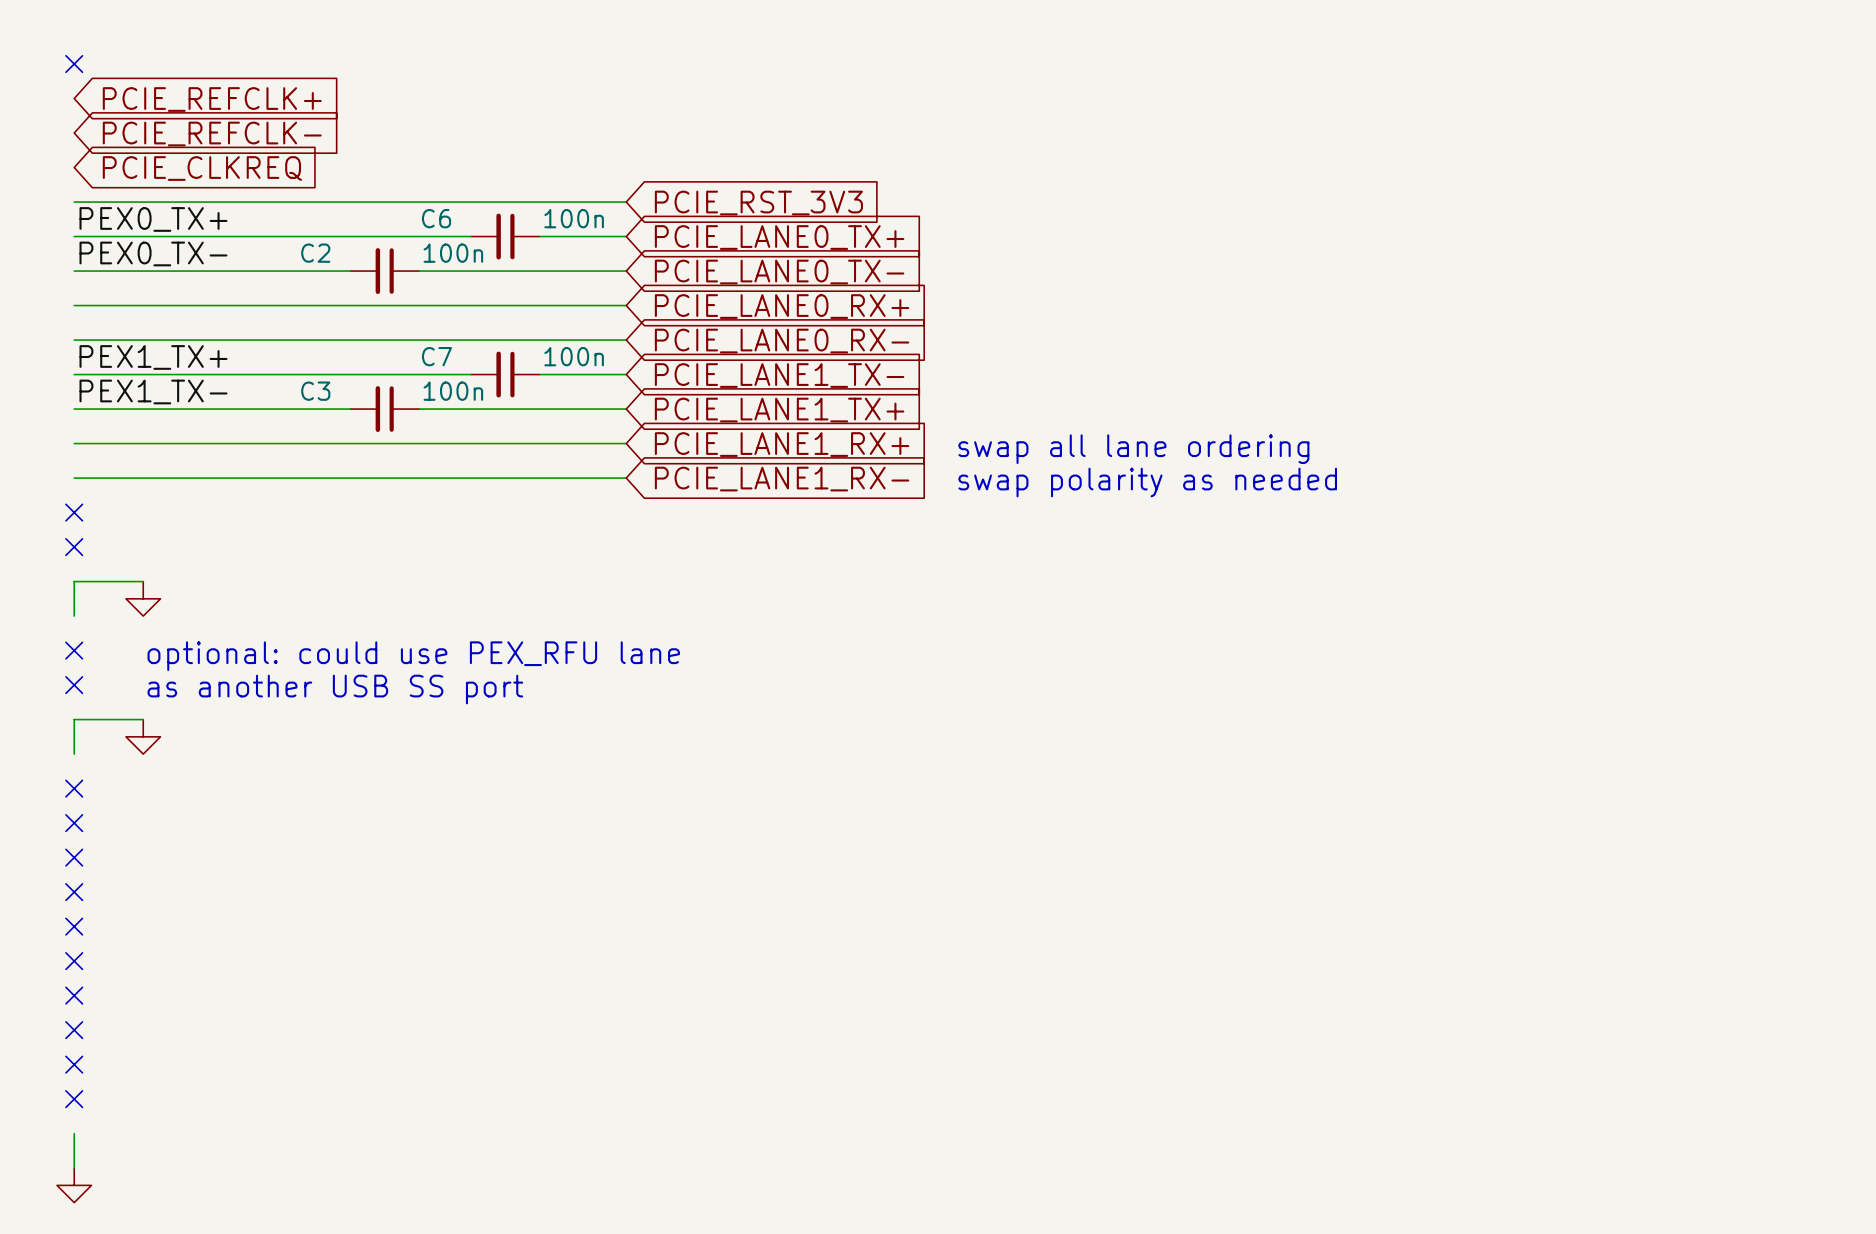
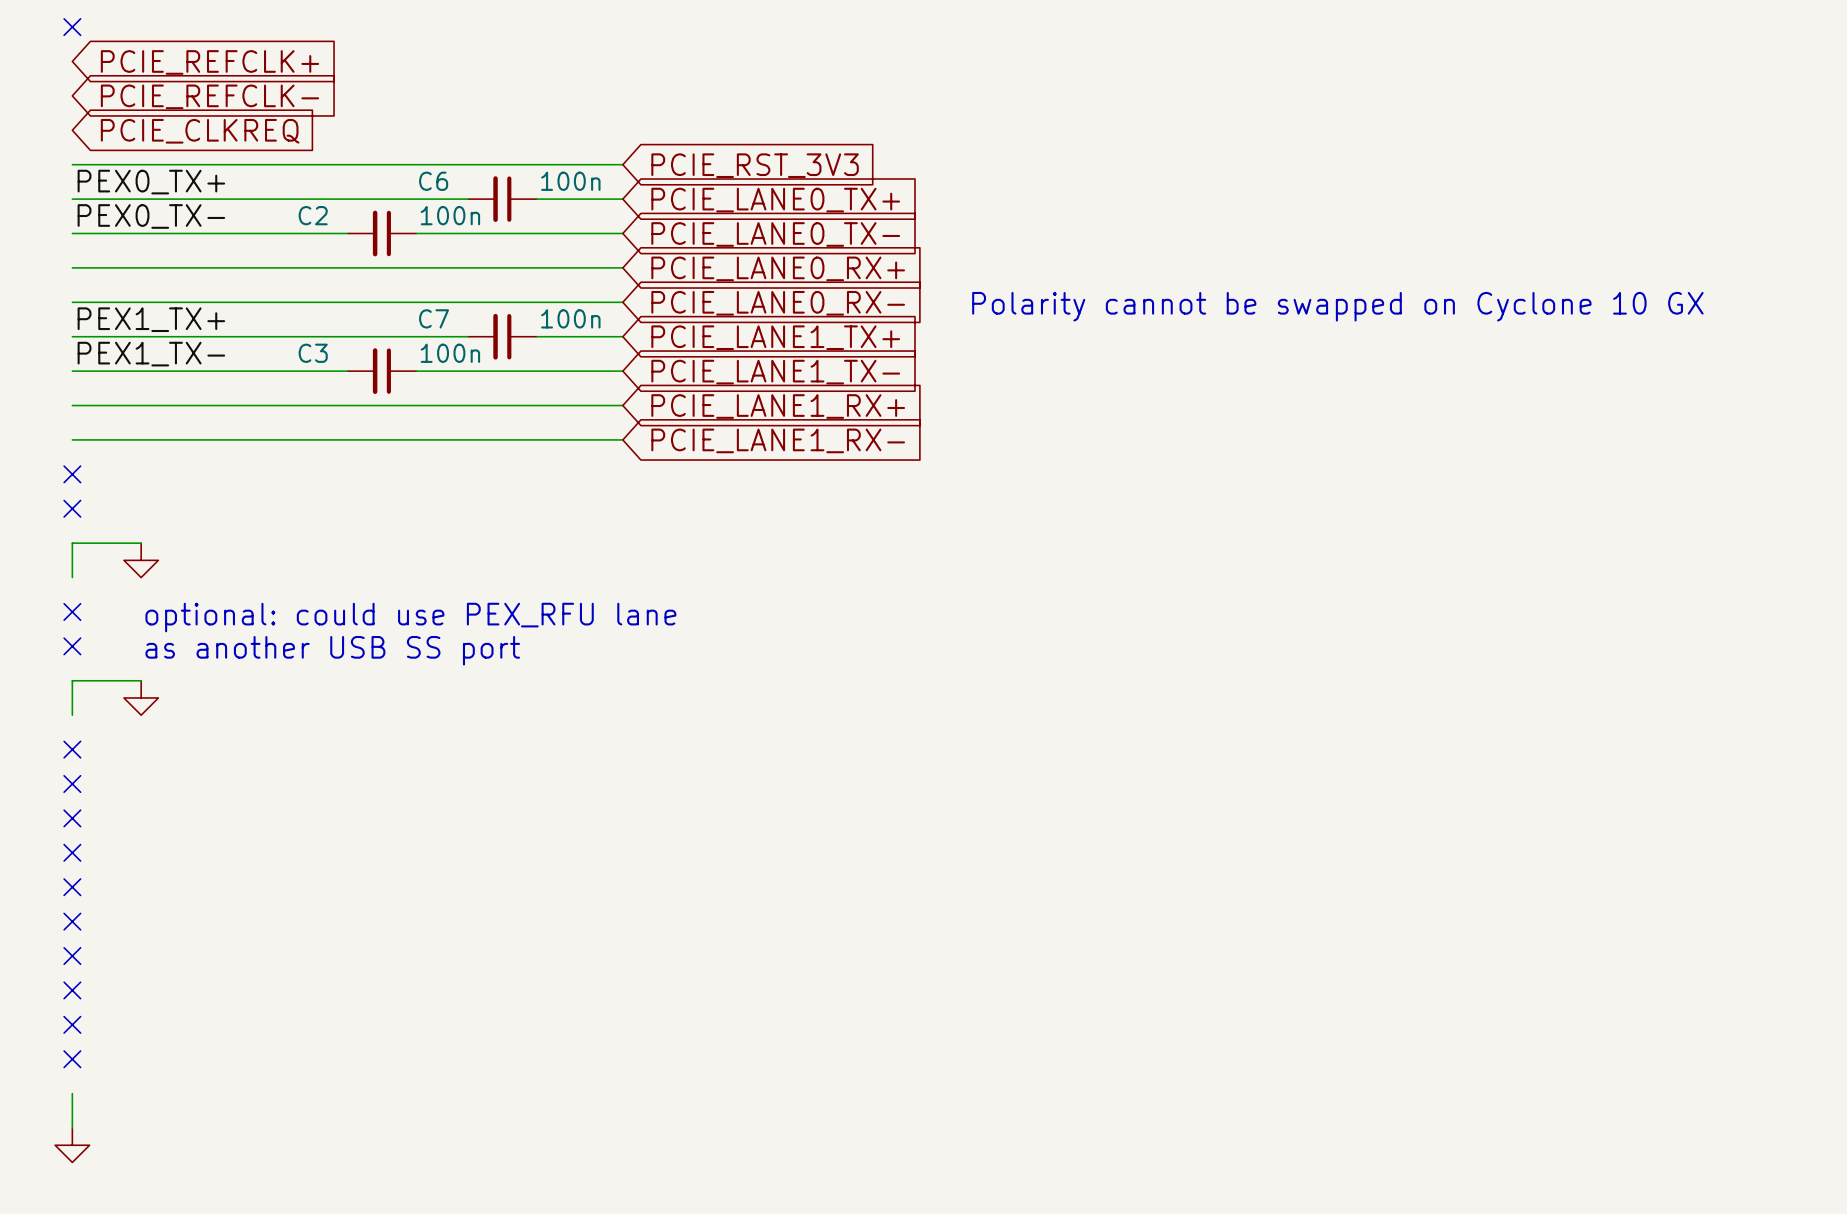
text: none -> Polarity cannot be swapped on Cyclone 10 GX (1337, 306)
global label: PCIE_LANE1_TX- (779, 375) -> PCIE_LANE1_TX+ (775, 337)
global label: PCIE_LANE1_TX+ (779, 410) -> PCIE_LANE1_TX- (775, 372)
text: swap all lane ordering (1133, 449) -> none
text: swap polarity as needed (1147, 482) -> none

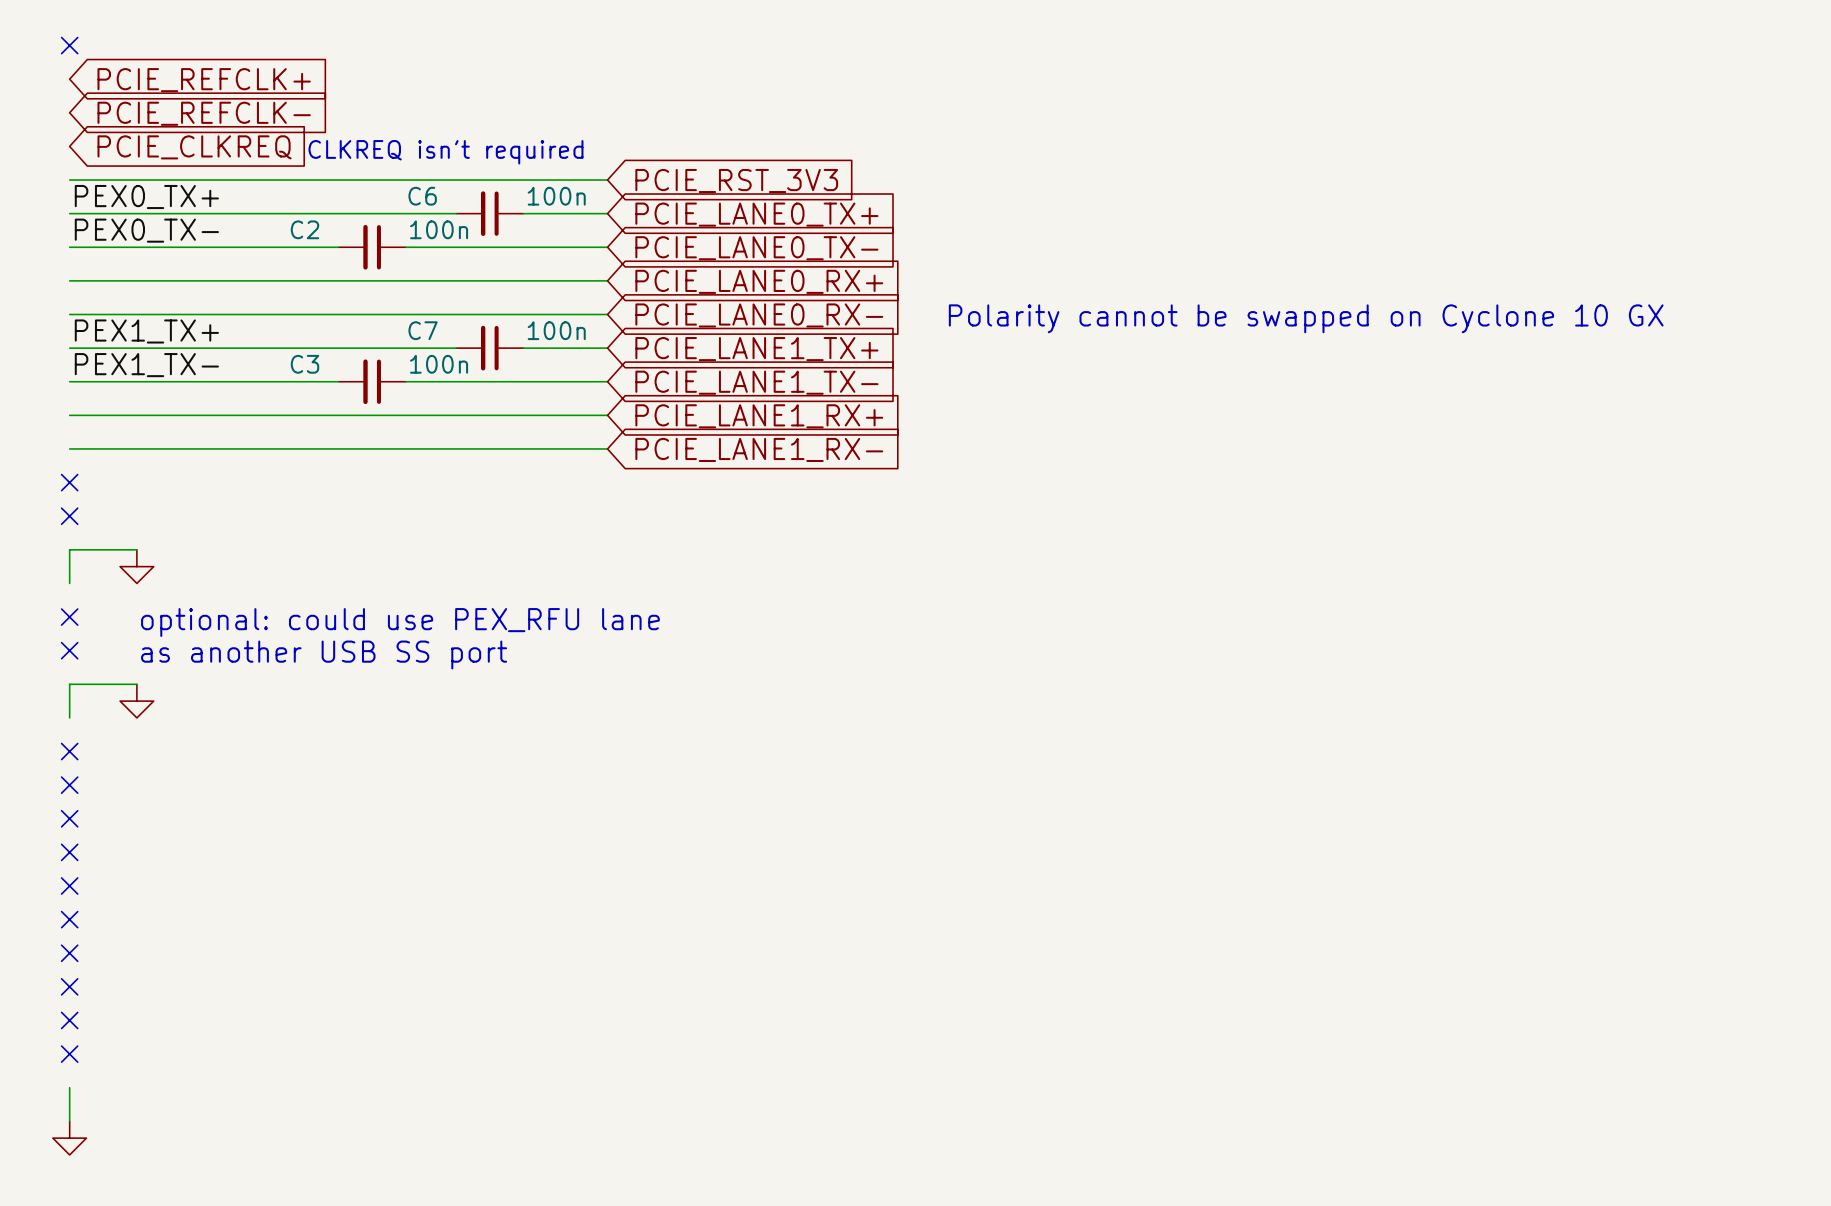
text: none -> CLKREQ isn't required (445, 152)

